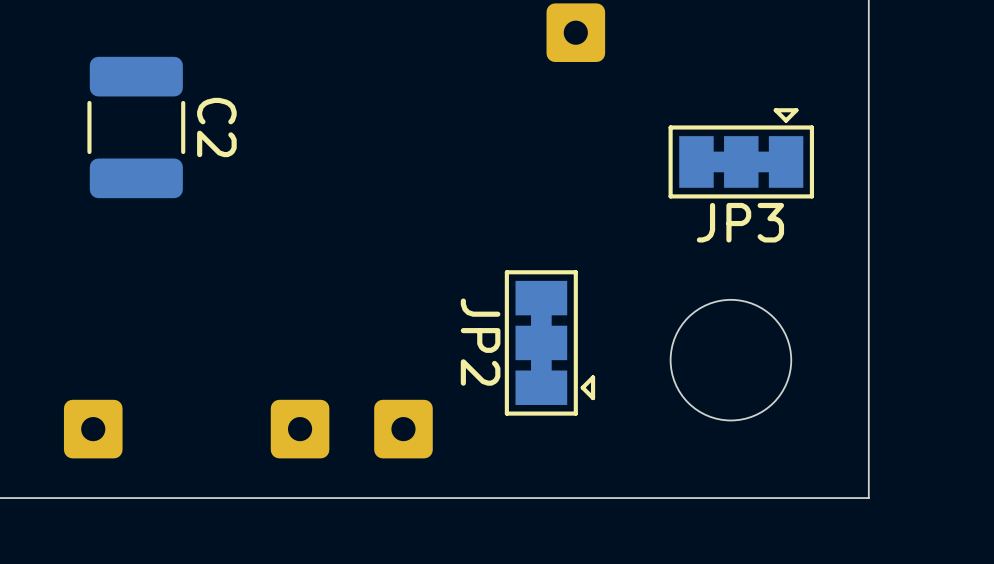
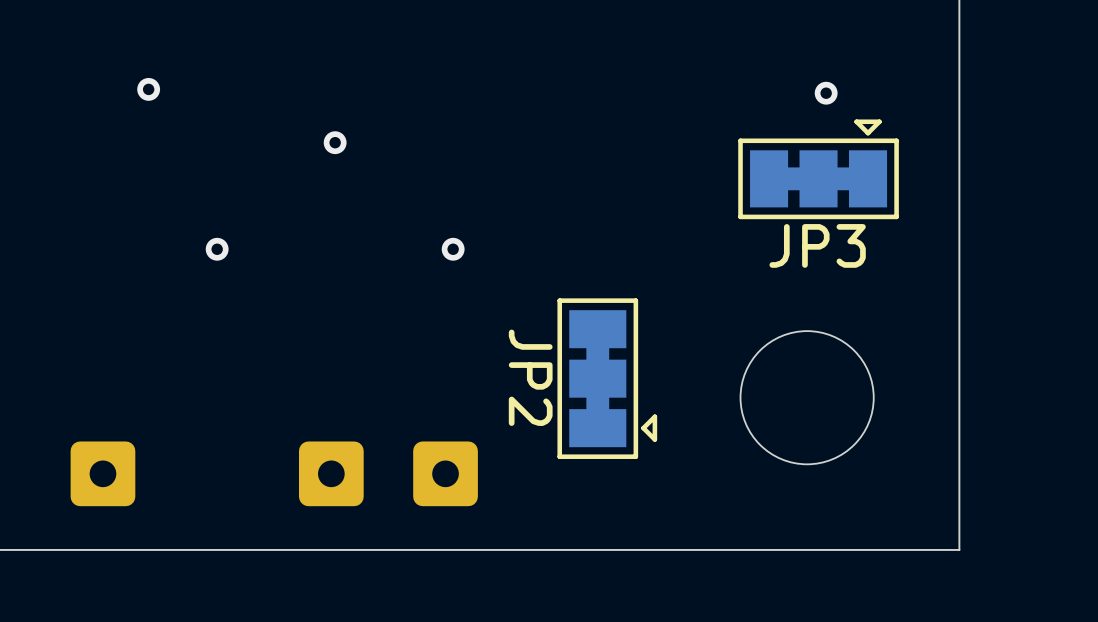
part: (575, 32) -> none
via: none -> (148, 89)
via: none -> (826, 93)
C2: (136, 127) -> none
via: none -> (335, 142)
via: none -> (217, 249)
via: none -> (453, 249)

